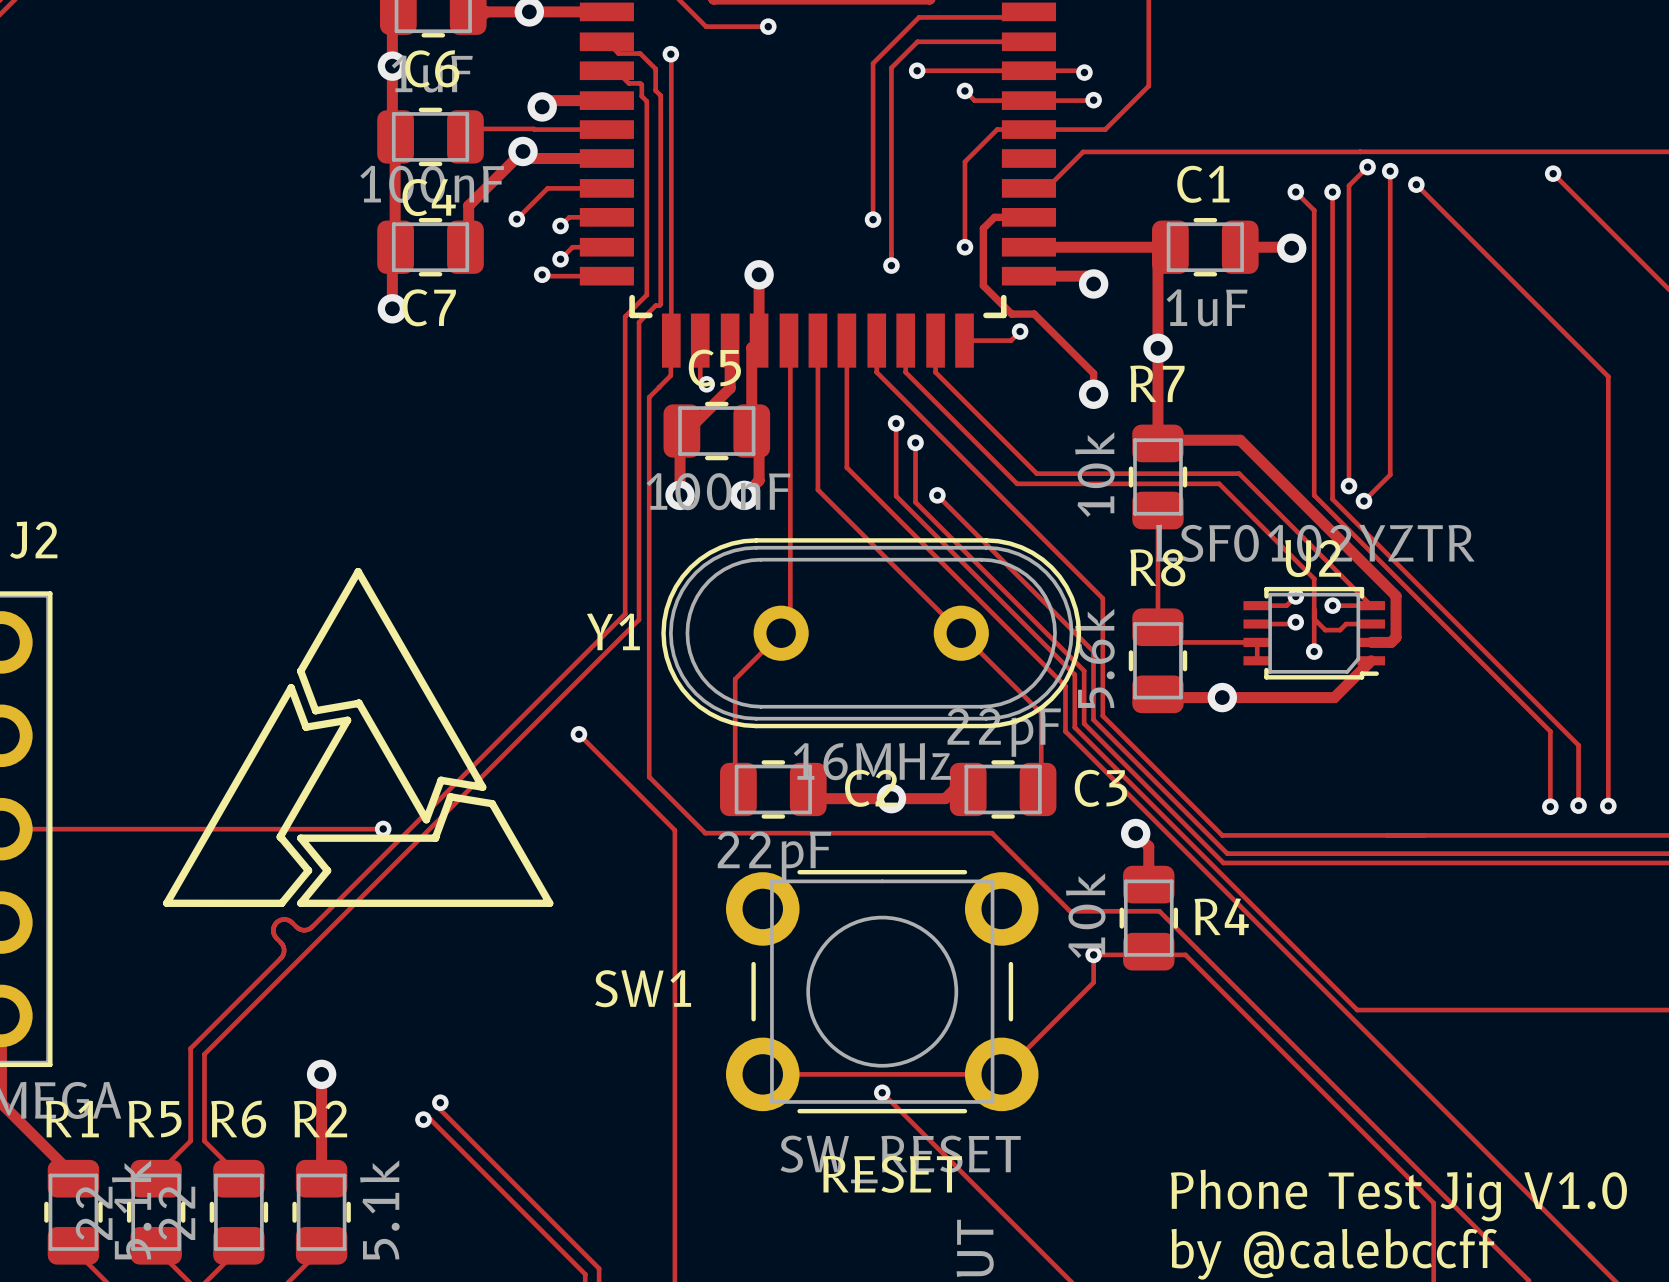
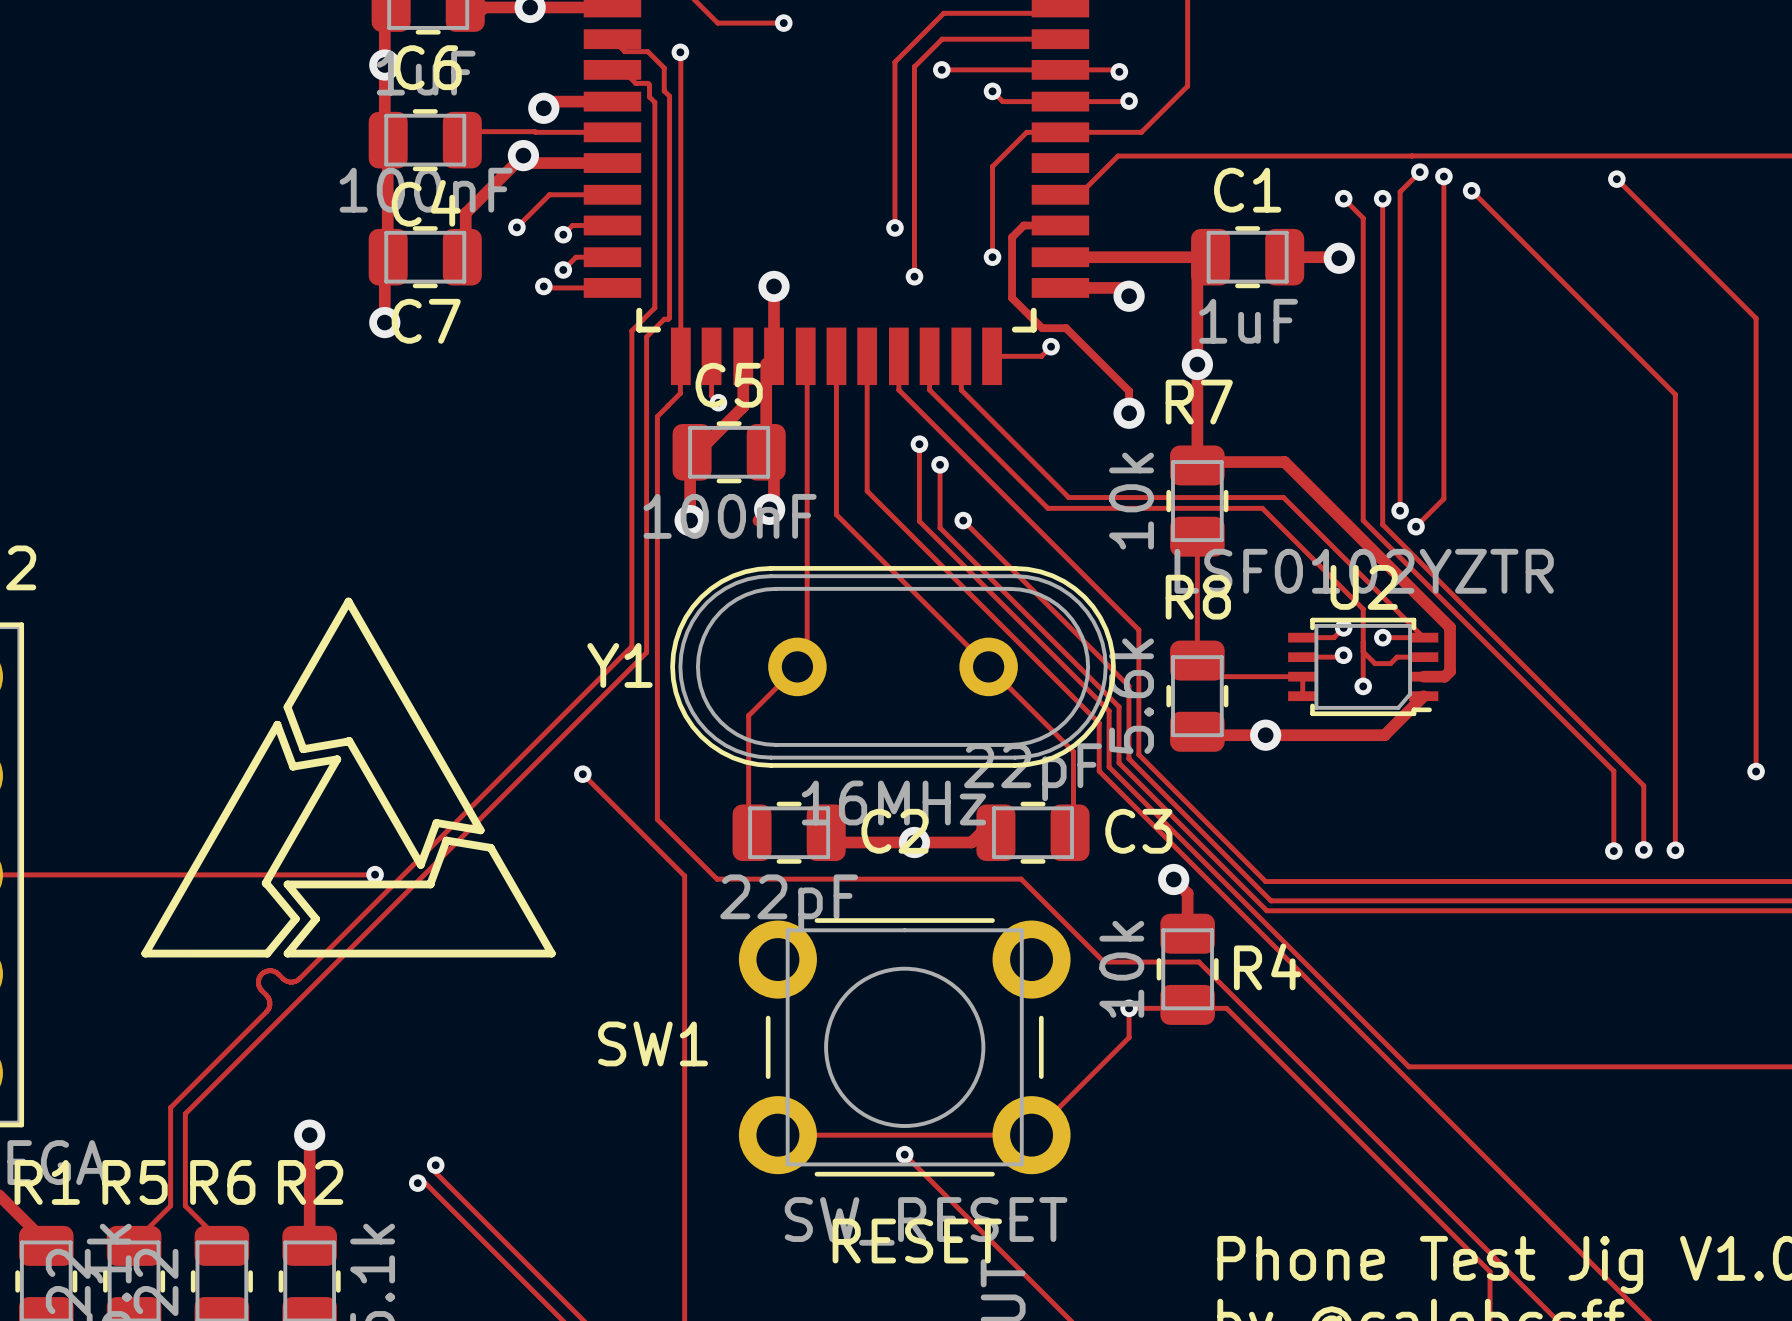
via position: (744, 495) -> (769, 509)

